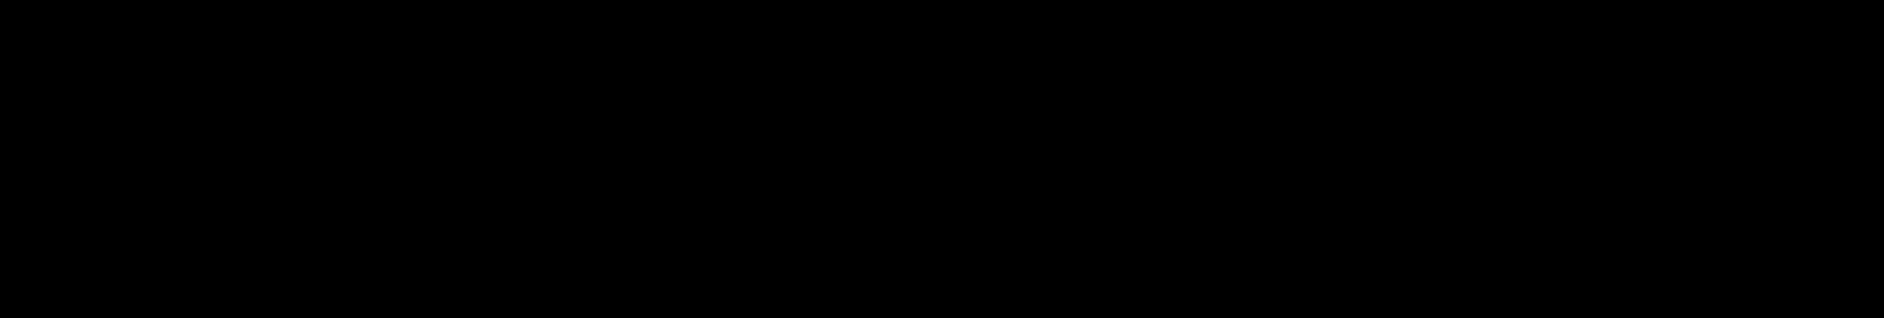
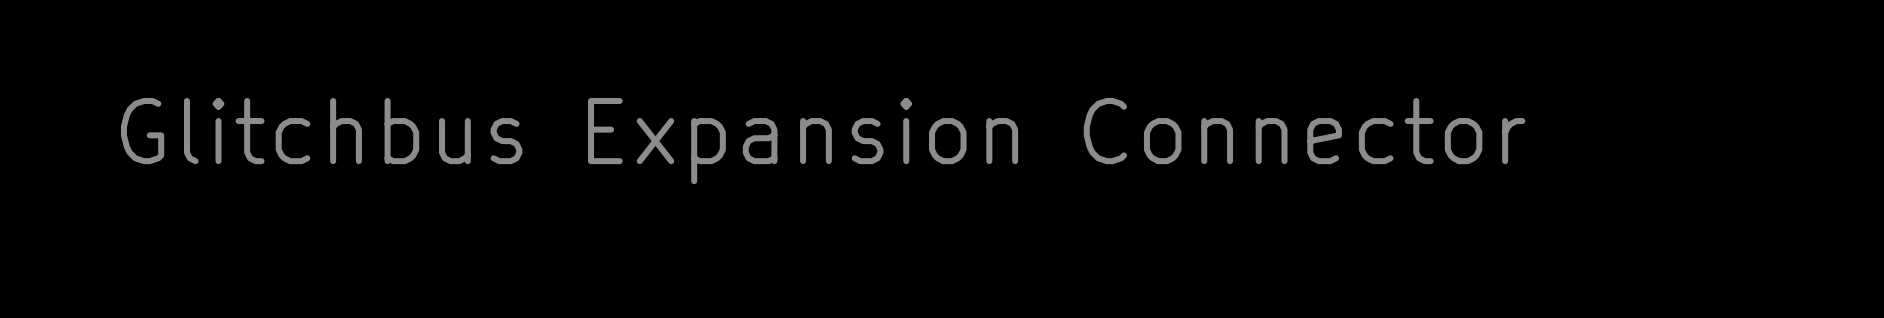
text: none -> Glitchbus Expansion Connector (823, 141)

